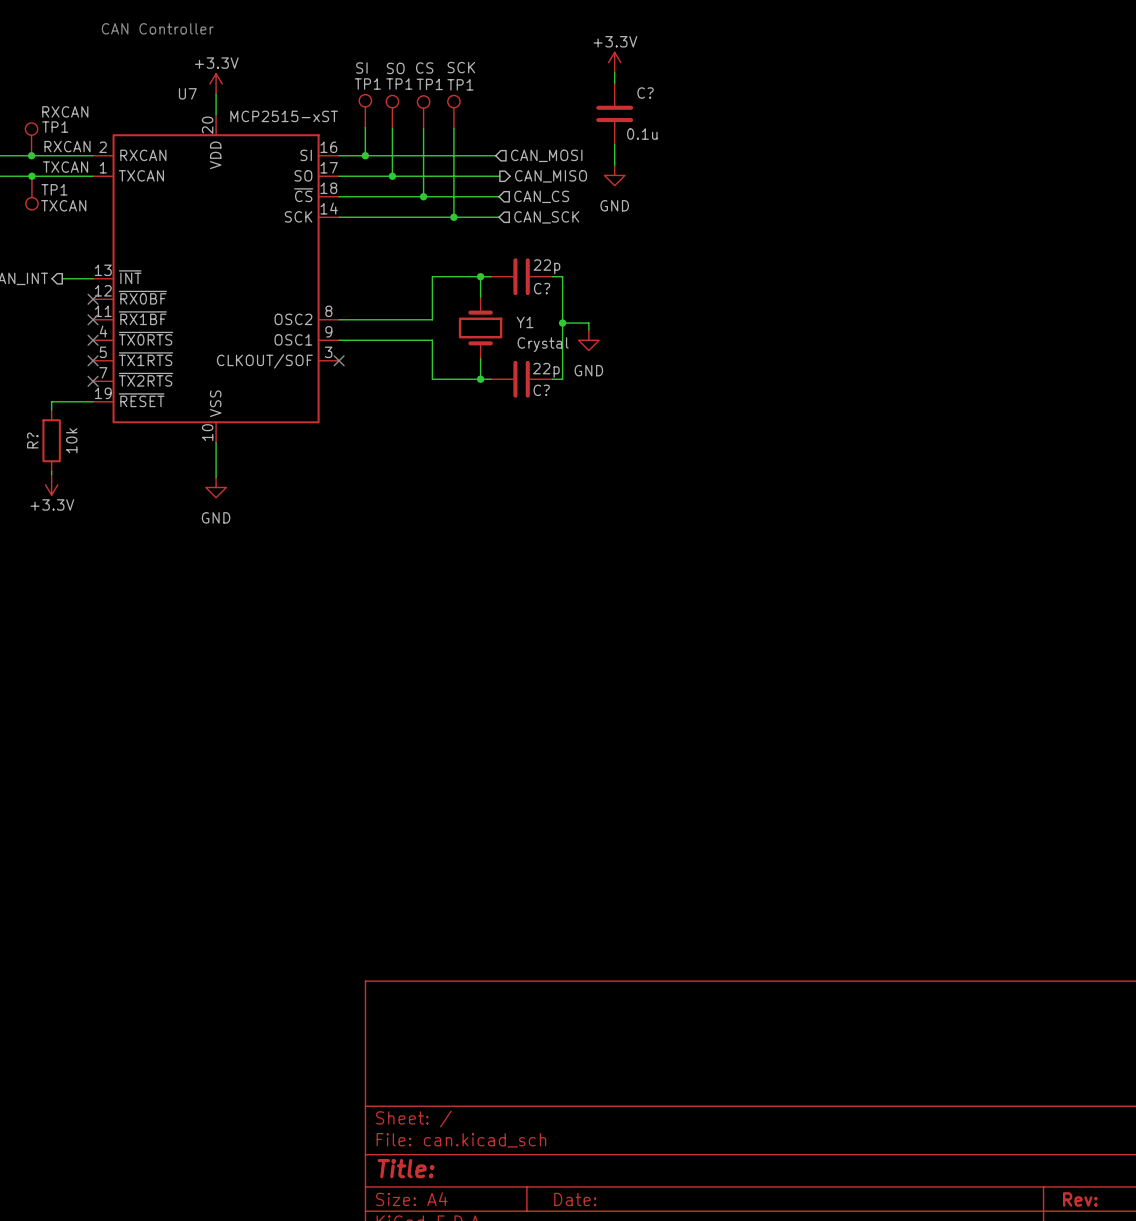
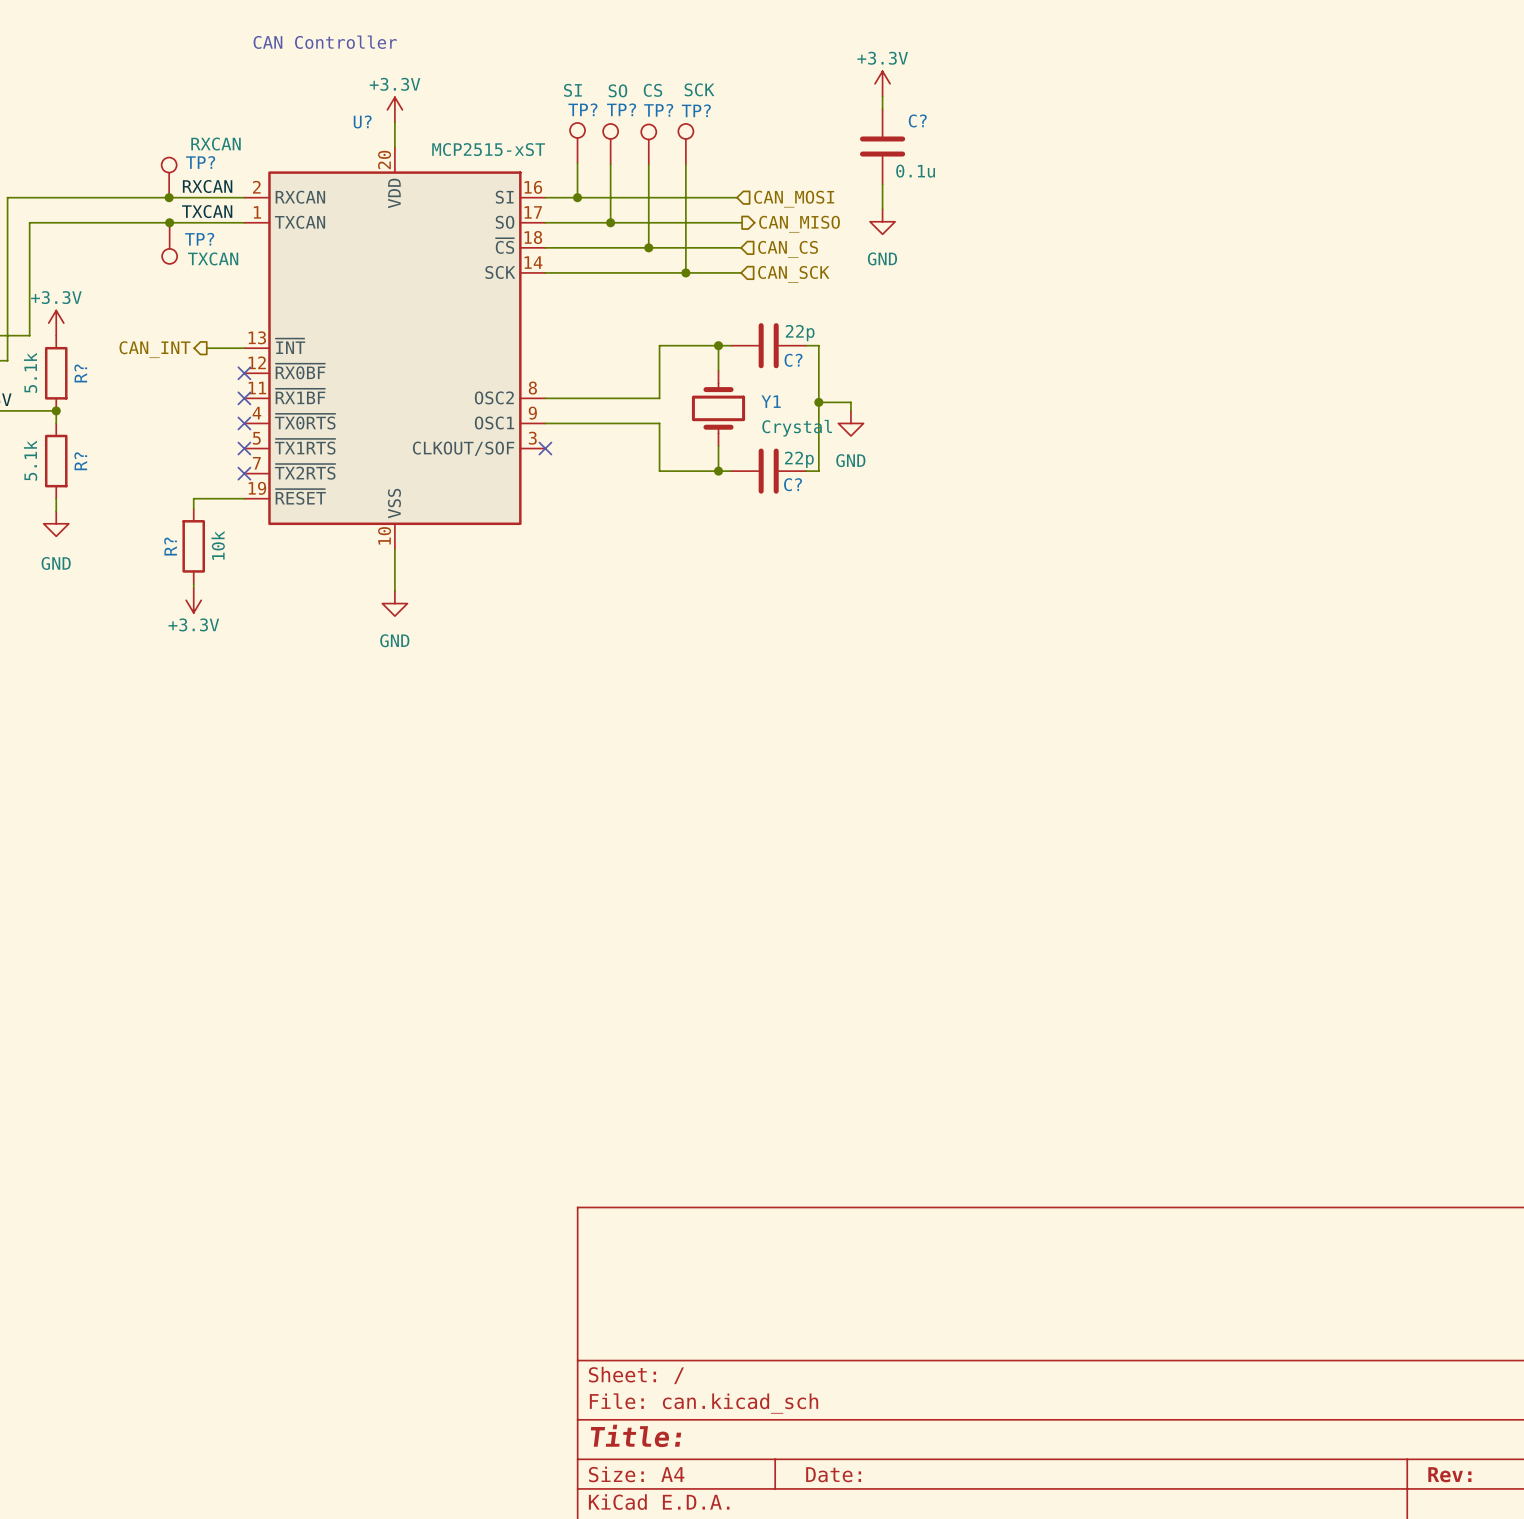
TP1 name: TP1 (367, 84) -> TP? (582, 109)
TP1 name: TP1 (399, 84) -> TP? (621, 109)
TP1 name: TP1 (429, 84) -> TP? (658, 110)
TP1 name: TP1 (460, 84) -> TP? (696, 110)
U7 name: U7 (187, 93) -> U? (362, 121)
TP1 name: TP1 (55, 127) -> TP? (200, 162)
TP1 name: TP1 (54, 189) -> TP? (199, 239)

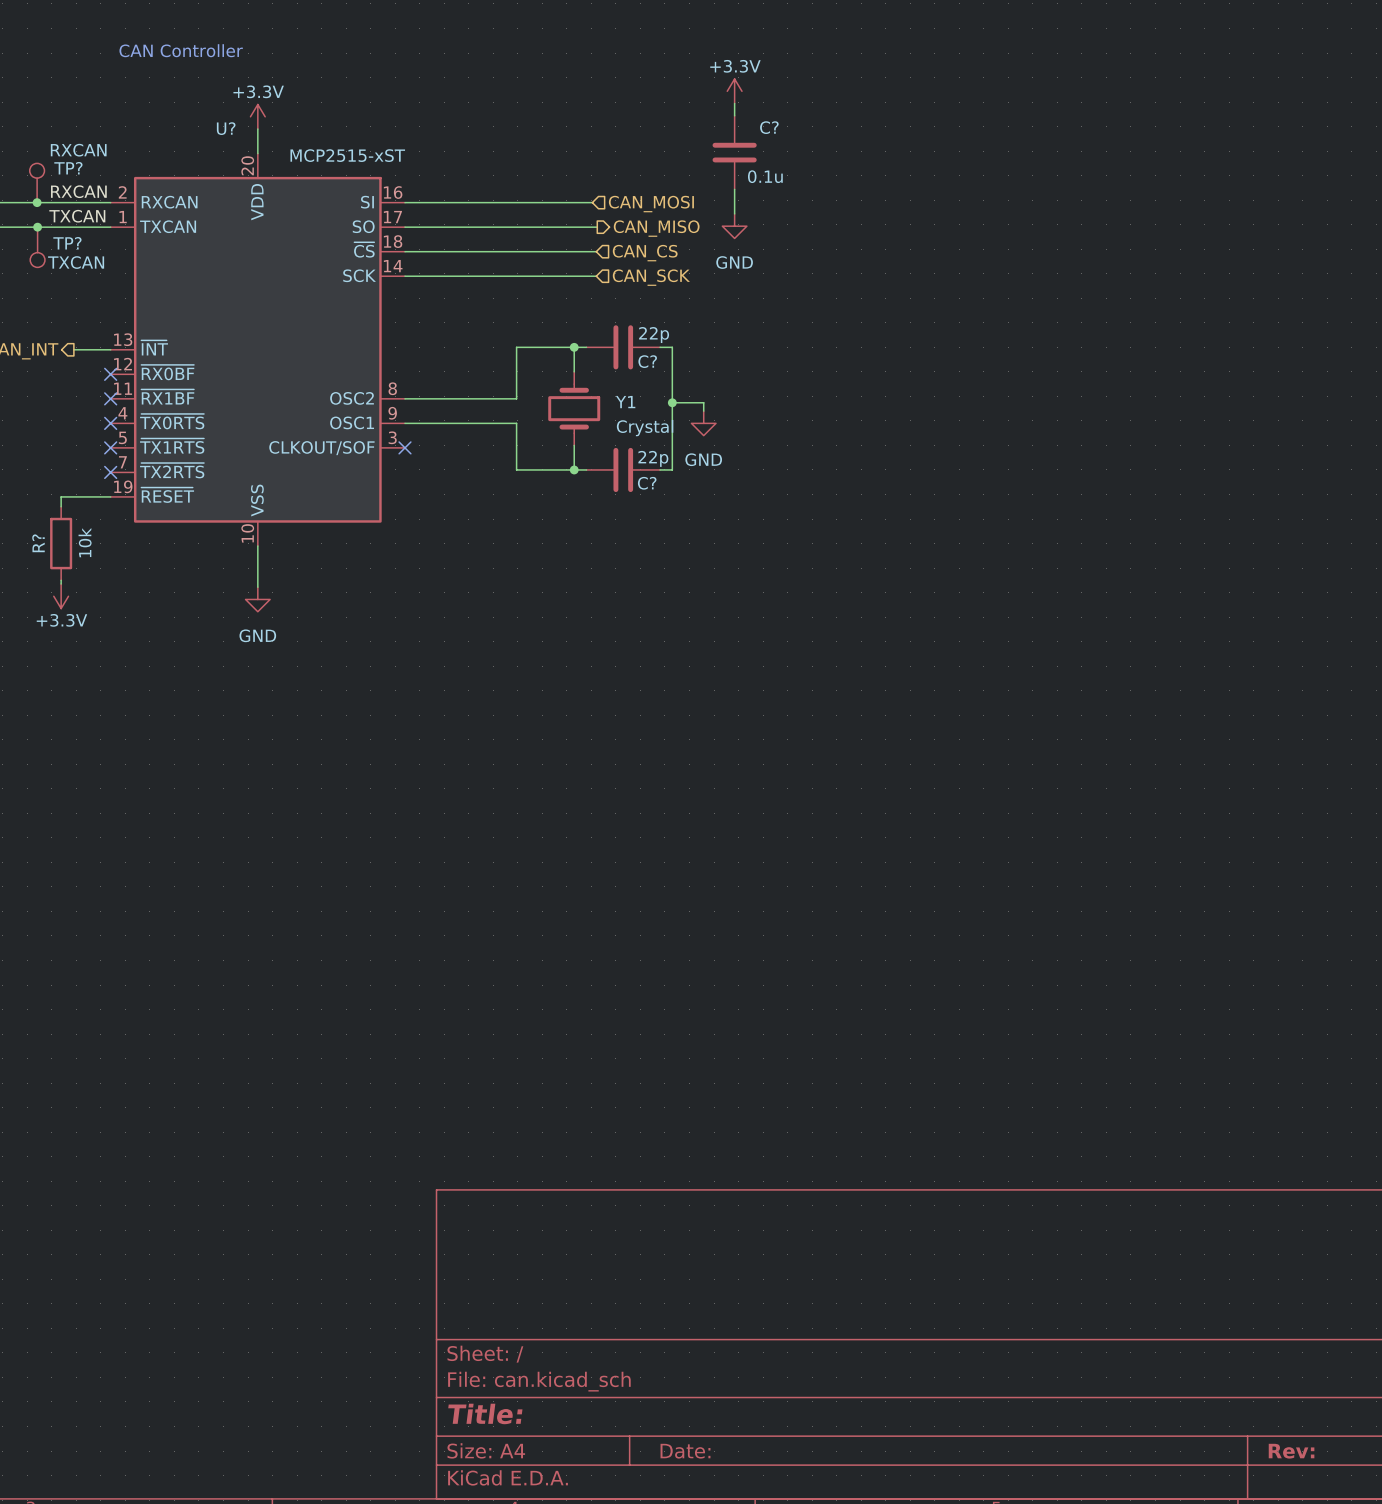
TP?: SI (577, 142) -> none
TP?: SO (610, 144) -> none
TP?: CS (648, 144) -> none
TP?: SCK (685, 144) -> none
wire: (577, 163) (577, 197) -> none
wire: (610, 164) (610, 222) -> none
wire: (648, 164) (648, 247) -> none
wire: (685, 164) (685, 272) -> none
junction: (577, 197) -> none
junction: (610, 222) -> none
junction: (648, 247) -> none
junction: (685, 272) -> none

